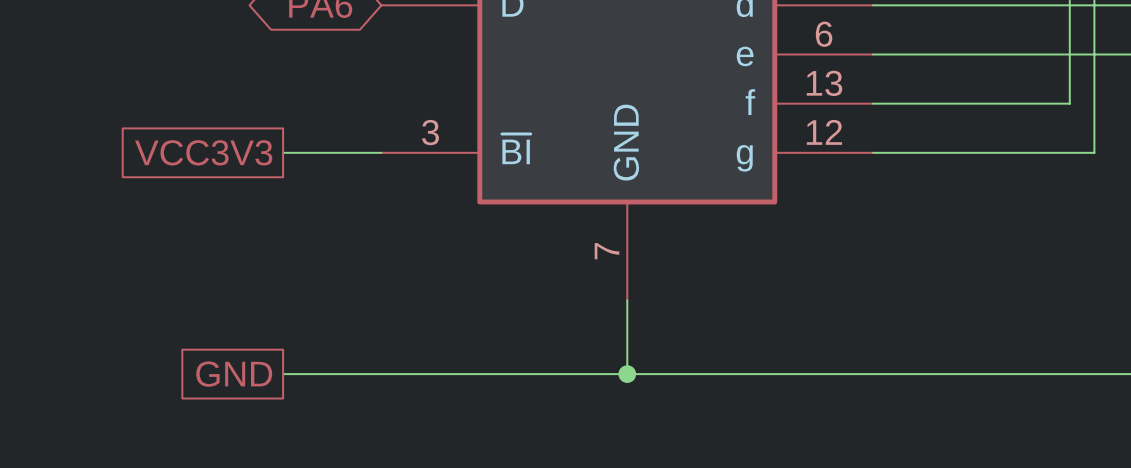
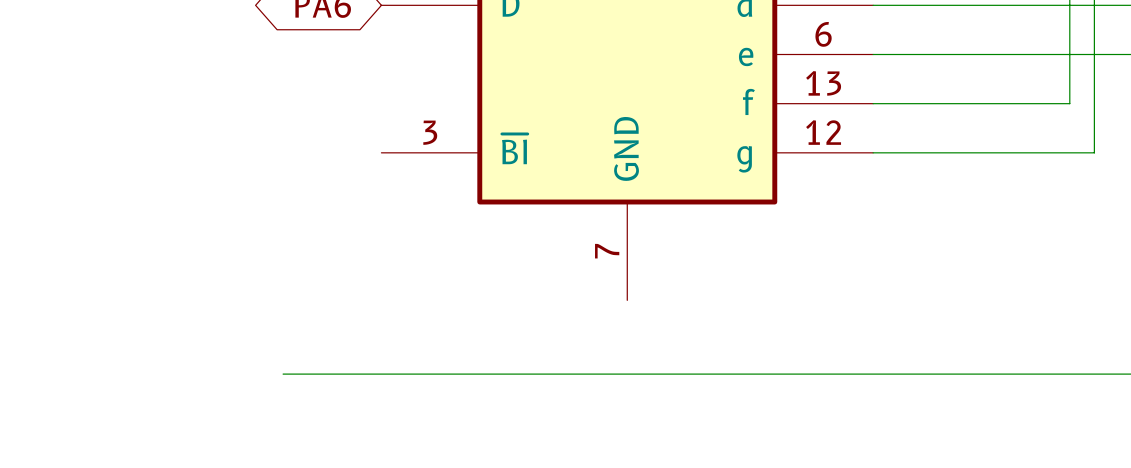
global label: VCC3V3 (203, 152) -> none
wire: (283, 152) (381, 152) -> none
wire: (627, 300) (627, 374) -> none
global label: GND (234, 374) -> none
junction: (627, 374) -> none

